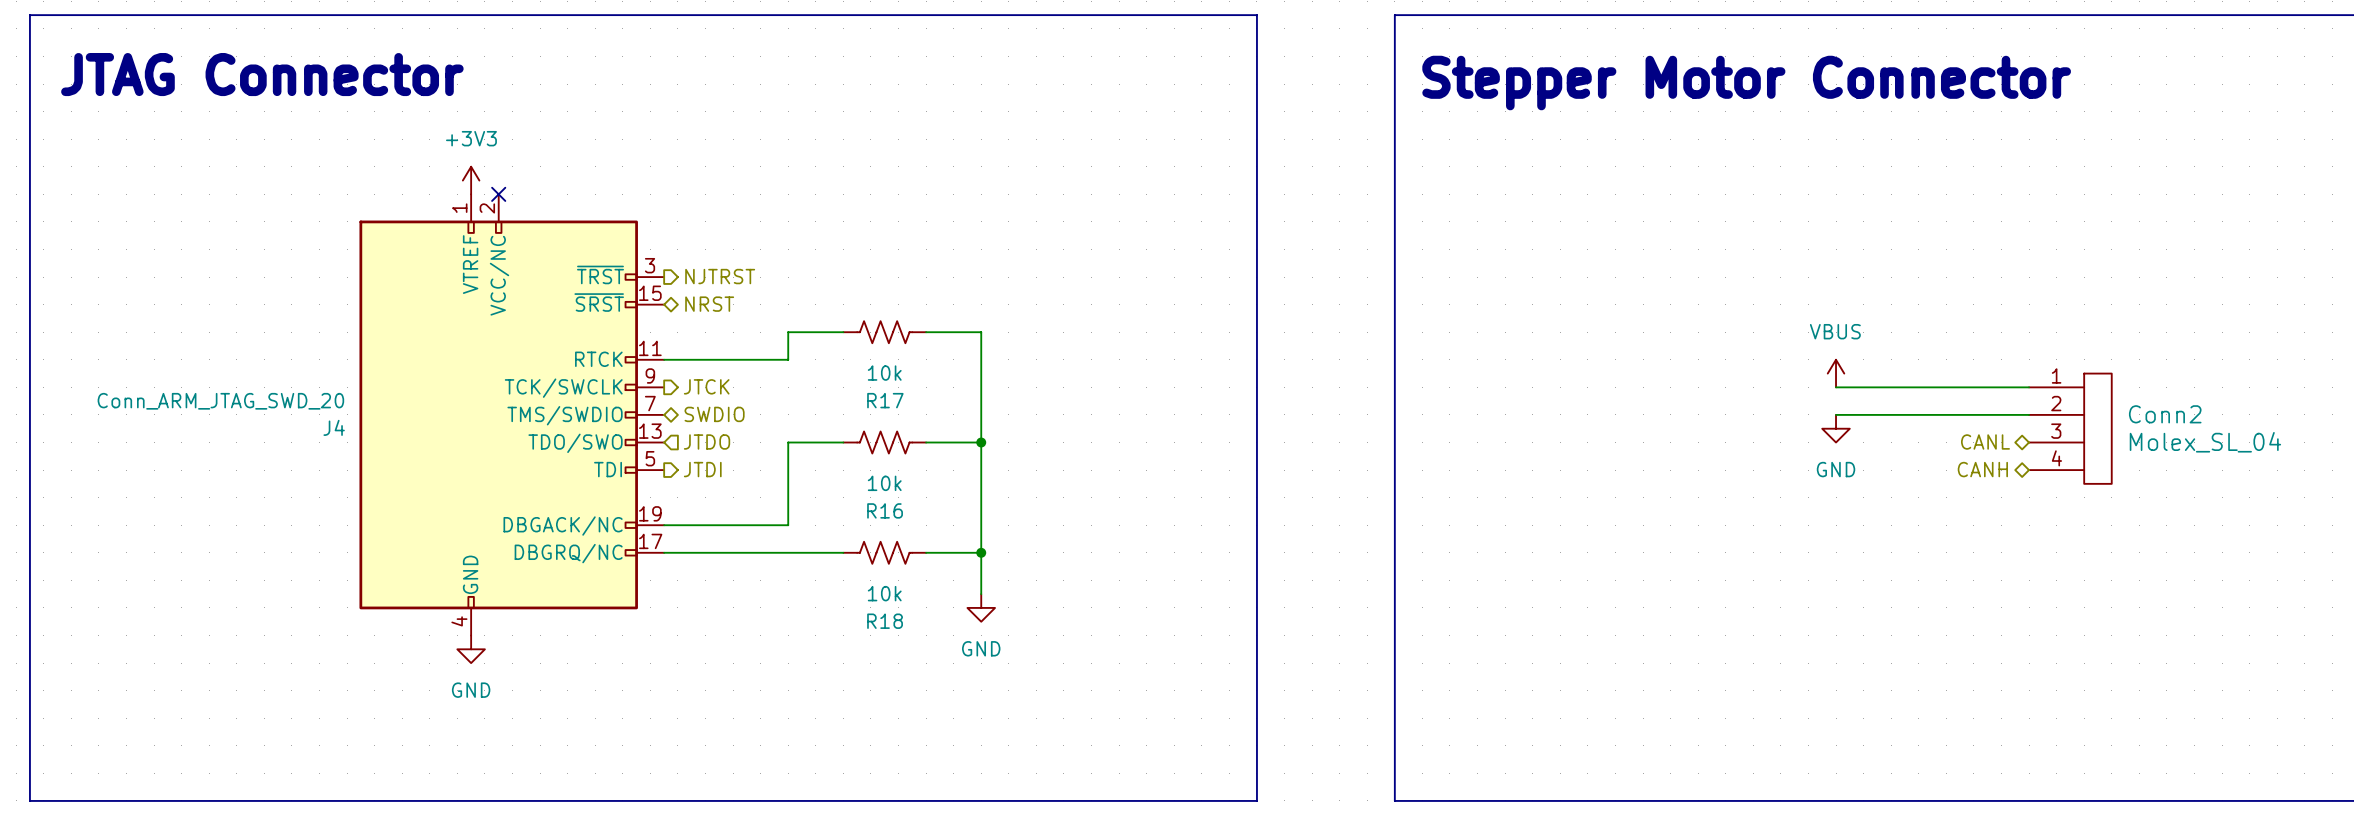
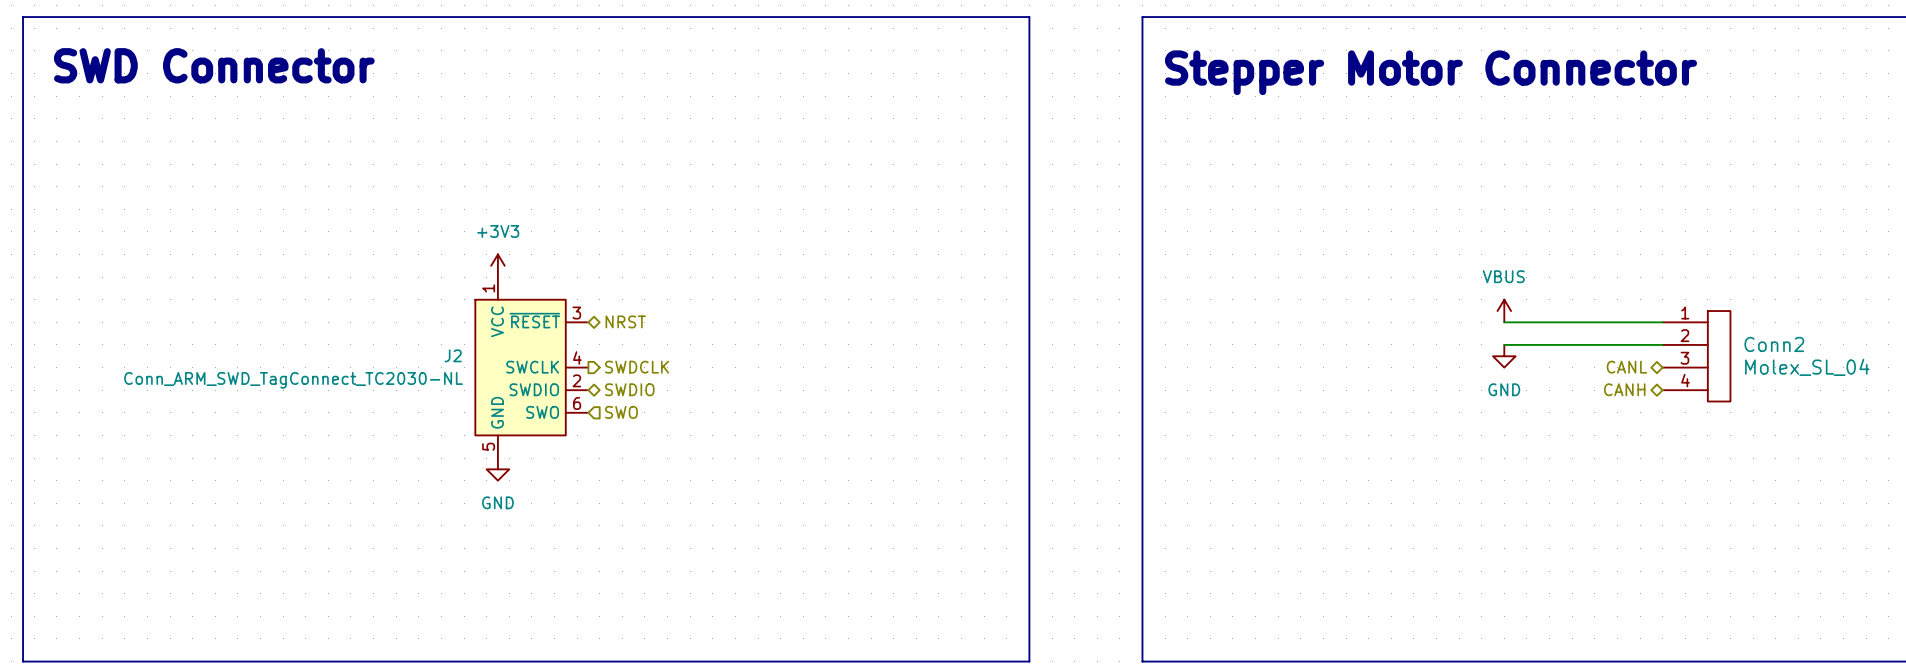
text: JTAG Connector (262, 74) -> SWD Connector (214, 65)
power symbol position: +3V3 (471, 180) -> +3V3 (497, 265)
no-connect mark: (498, 194) -> none
hierarchical label: NJTRST (720, 276) -> none
hierarchical label position: NRST (709, 304) -> NRST (625, 321)
wire: (843, 332) (788, 332) (788, 359) (664, 359) -> none
R17: 10k (884, 332) -> none
wire: (926, 332) (981, 332) (981, 594) -> none
hierarchical label: JTCK (706, 386) -> none
J4: Conn_ARM_JTAG_SWD_20 (511, 414) -> none
hierarchical label position: SWDIO (714, 414) -> SWDIO (629, 389)
hierarchical label: JTDO (707, 441) -> none
hierarchical label: none -> SWDCLK (637, 367)
J2: none -> Conn_ARM_SWD_TagConnect_TC2030-NL (531, 367)
wire: (843, 442) (788, 442) (788, 525) (664, 525) -> none
R16: 10k (884, 442) -> none
wire: (926, 442) (981, 442) -> none
junction: (981, 442) -> none
hierarchical label: JTDI (702, 469) -> none
hierarchical label: none -> SWO (621, 412)
wire: (664, 552) (843, 552) -> none
R18: 10k (884, 552) -> none
wire: (926, 552) (981, 552) -> none
junction: (981, 552) -> none
power symbol: GND (981, 607) -> none
power symbol position: GND (471, 649) -> GND (497, 469)

